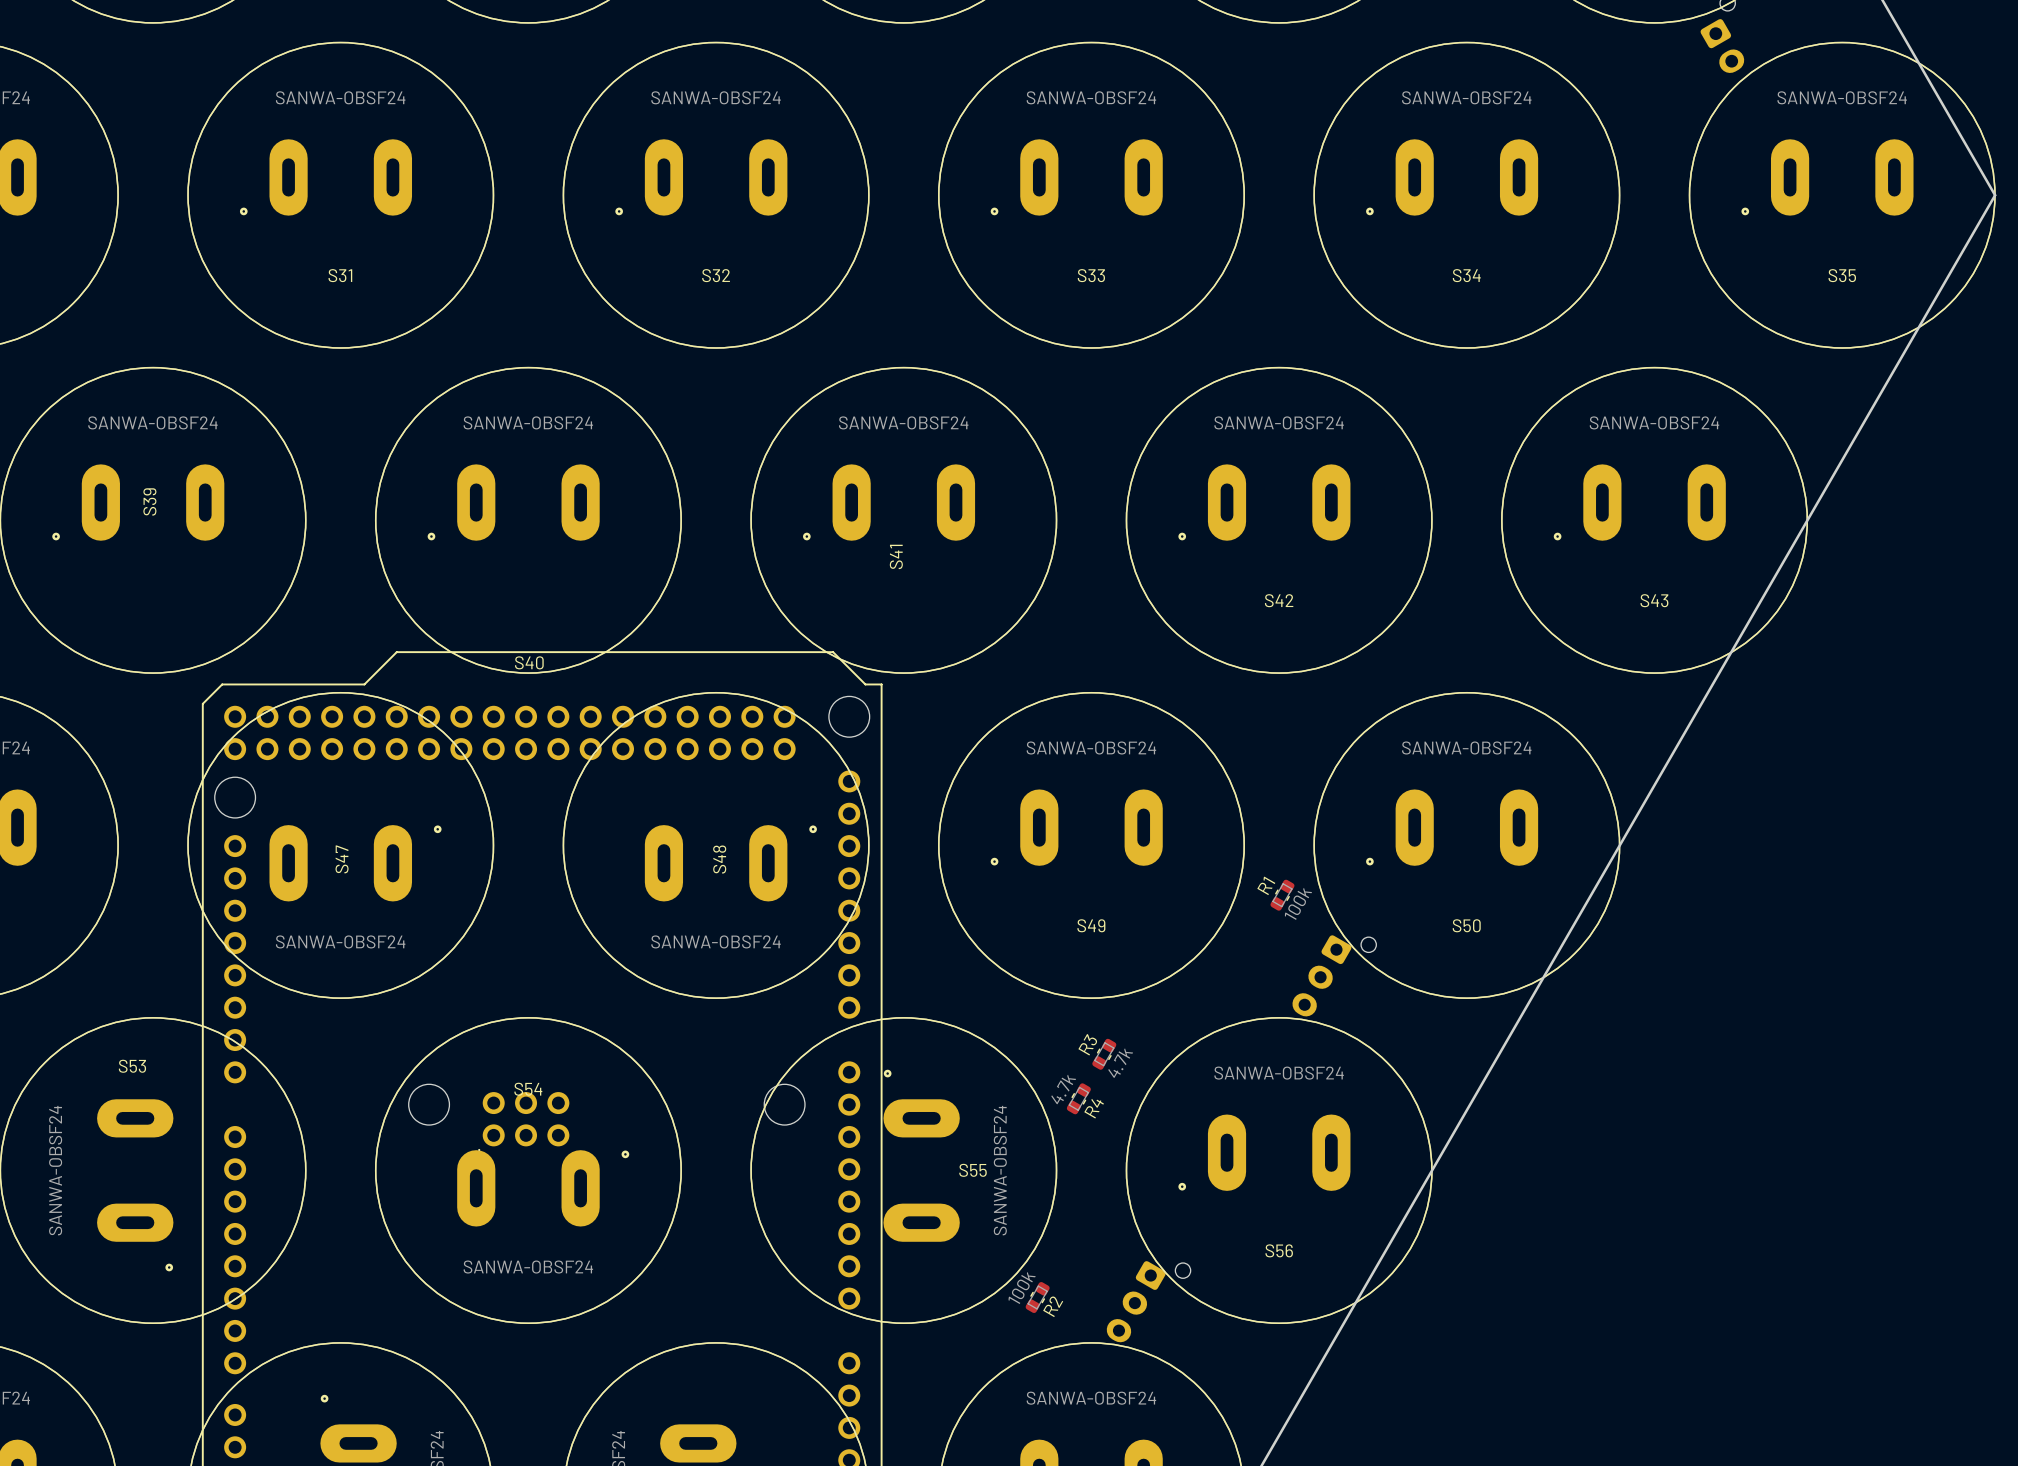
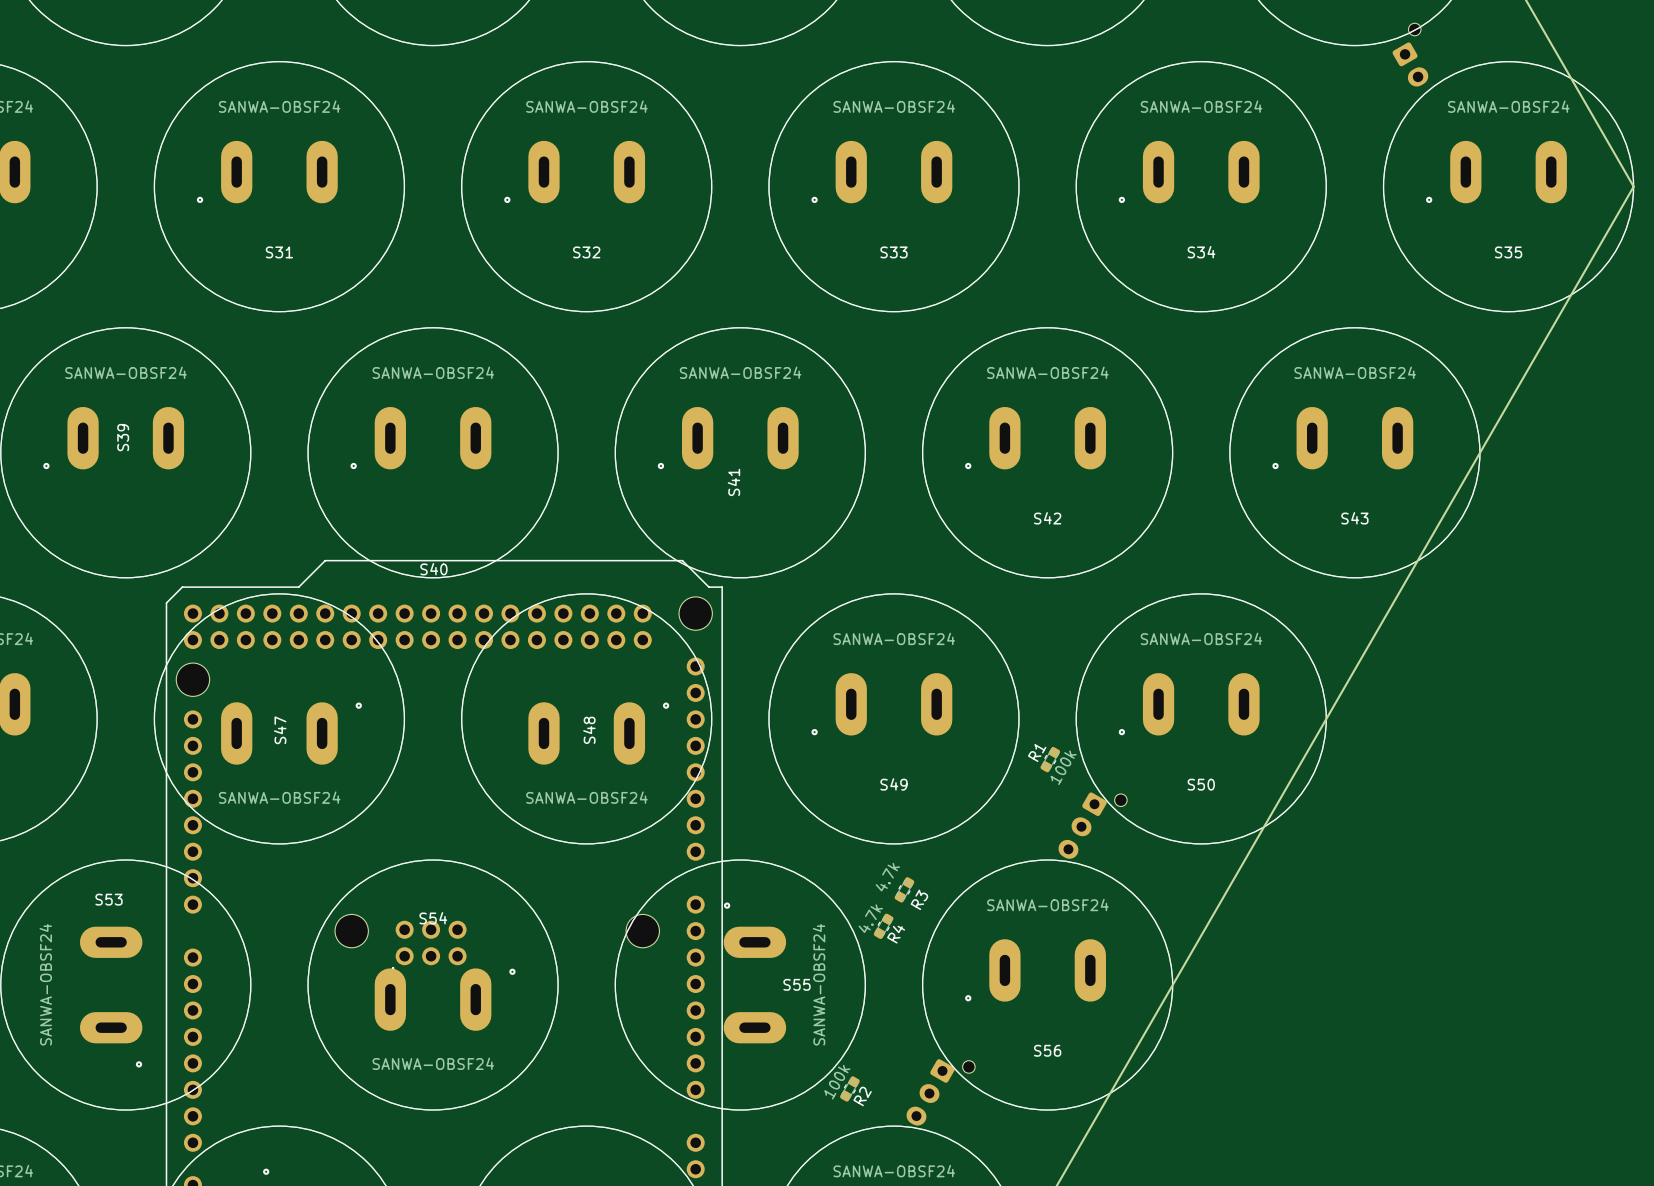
R3 name position: R3 (1087, 1044) -> R3 (919, 899)
R3 value position: 4.7k (1120, 1063) -> 4.7k (887, 877)

